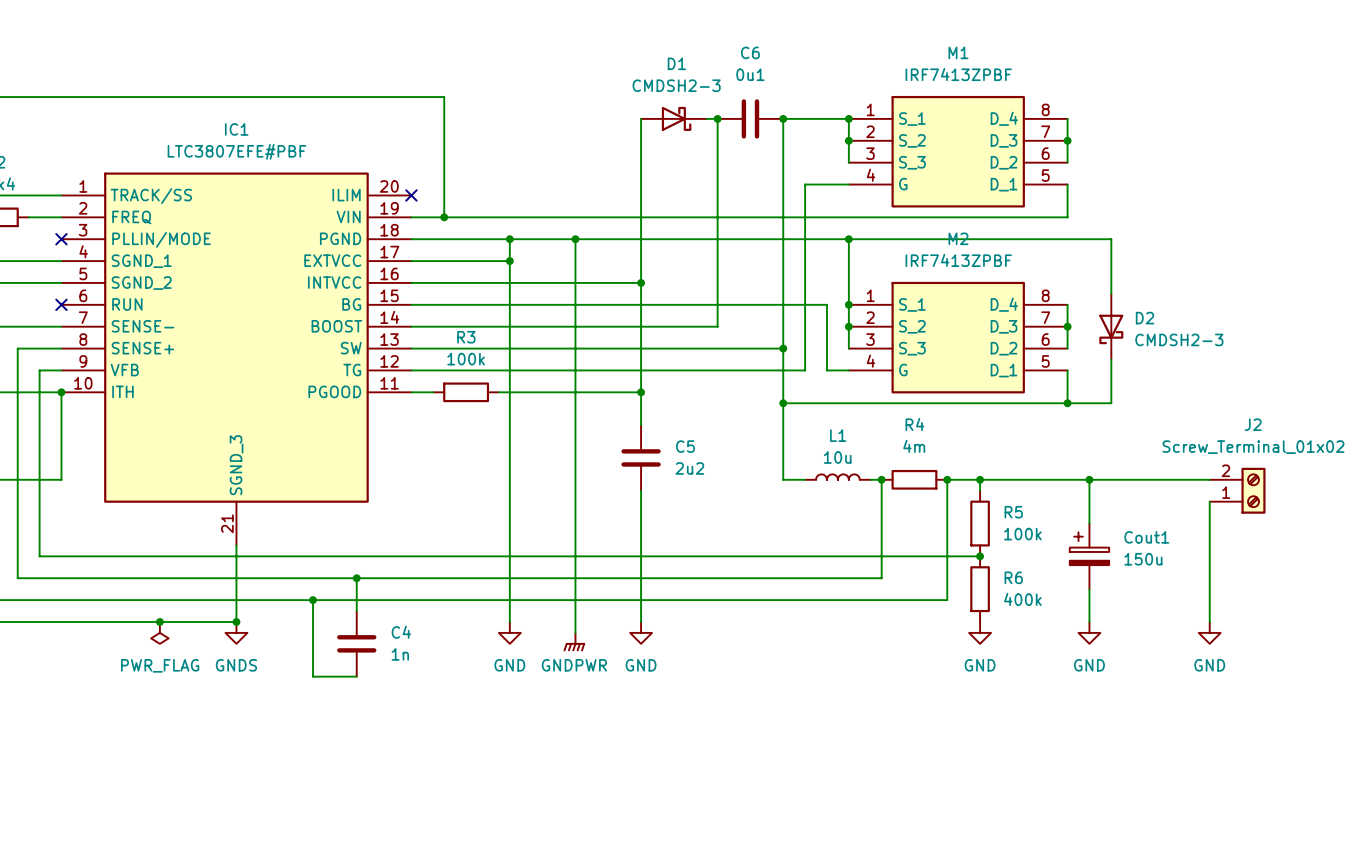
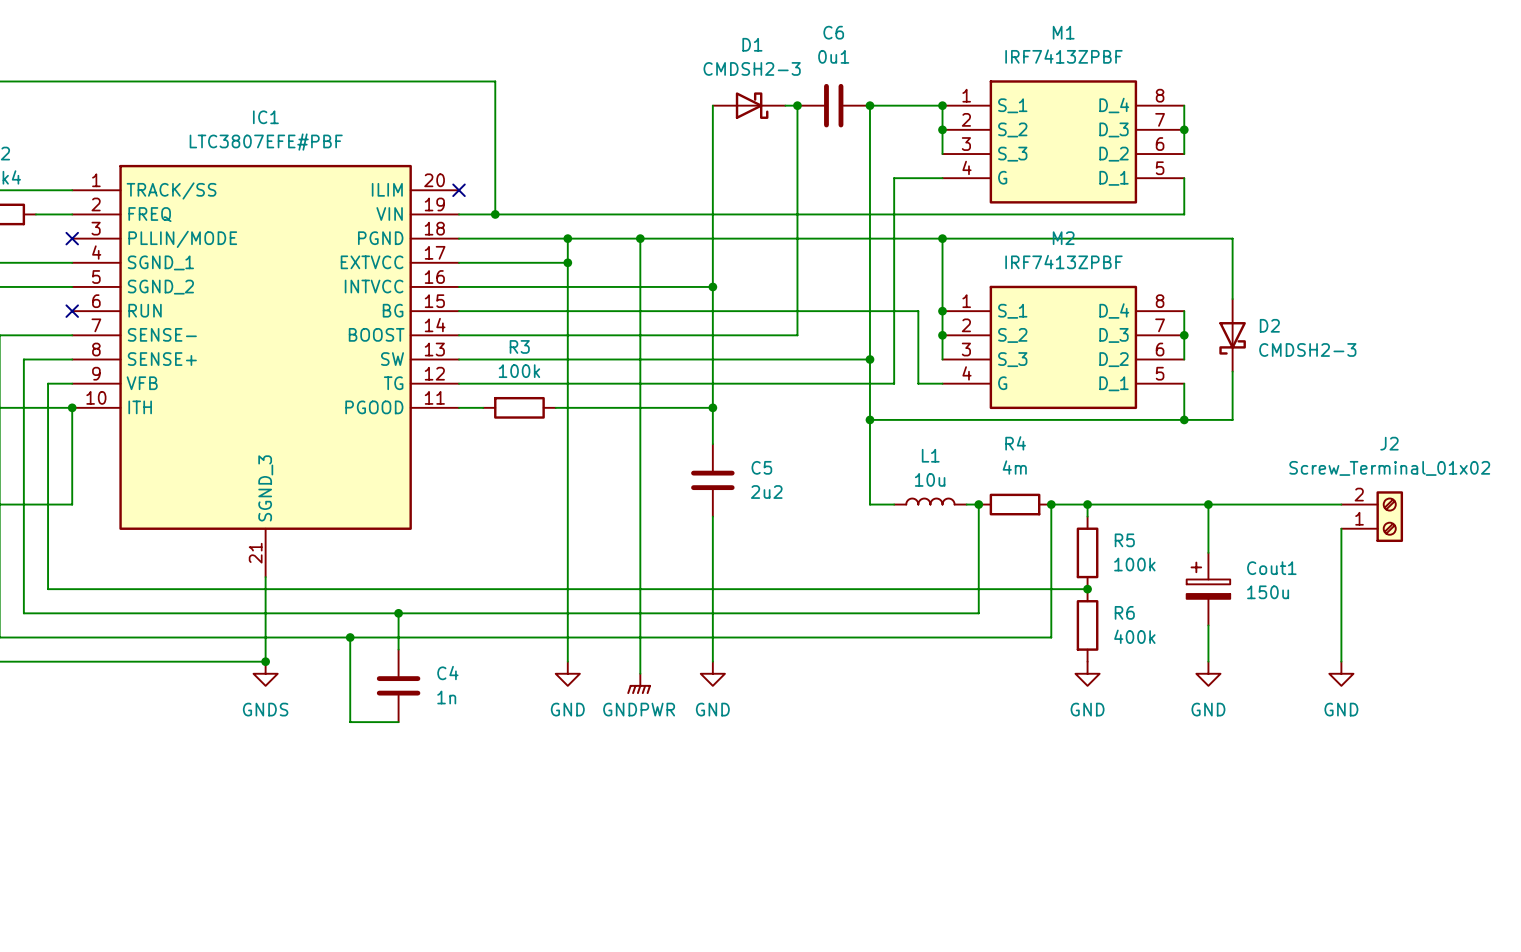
junction: (159, 621) -> none
power symbol: PWR_FLAG (159, 632) -> none

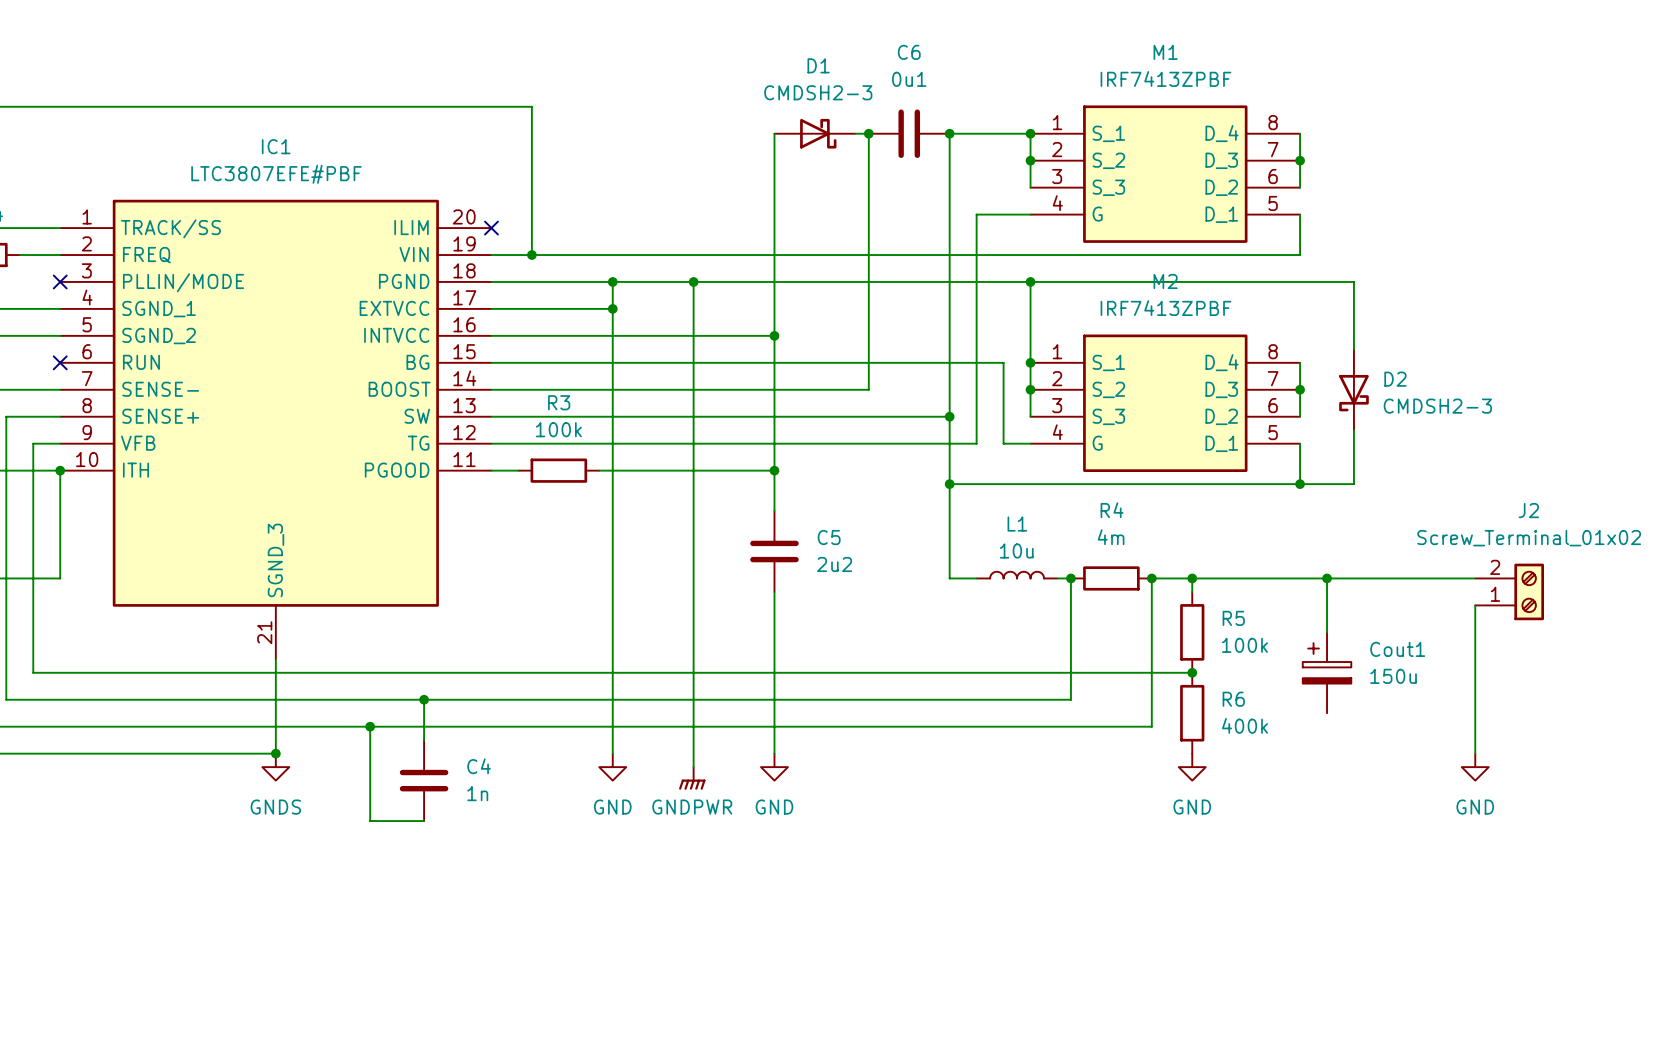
wire: (1208, 625) (1208, 661) -> none
power symbol: GND (1208, 673) -> none

